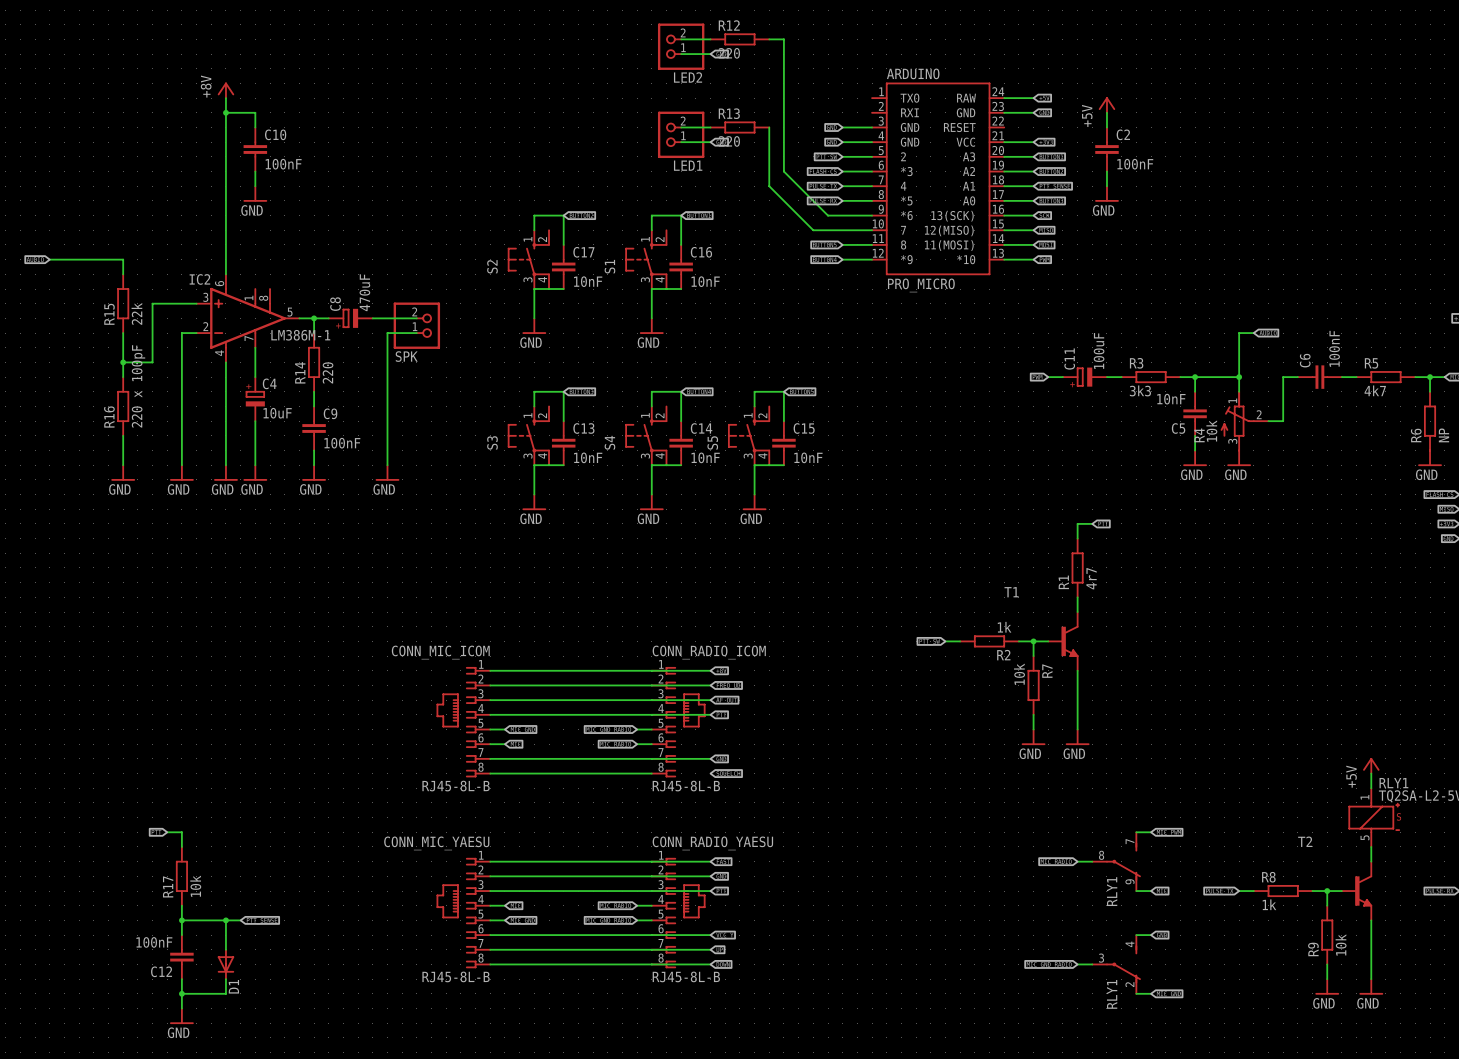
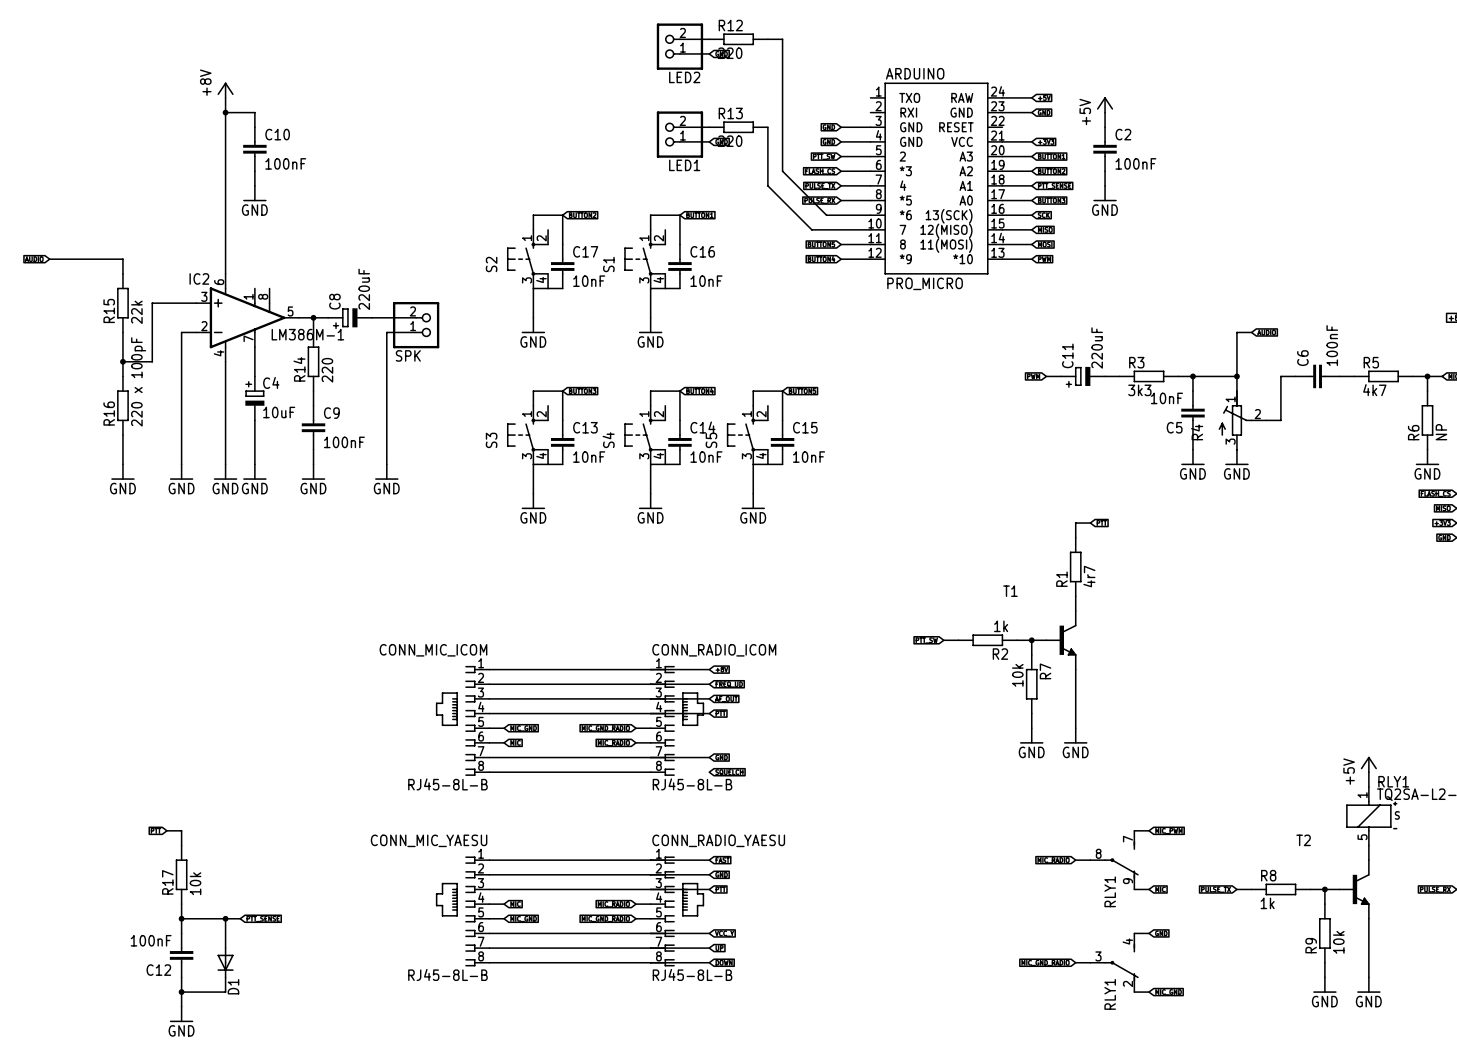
C8 value: 470uF (364, 292) -> 220uF (364, 289)
C11 value: 100uF (1099, 351) -> 220uF (1097, 347)
R4 value: 10k (1211, 431) -> none

